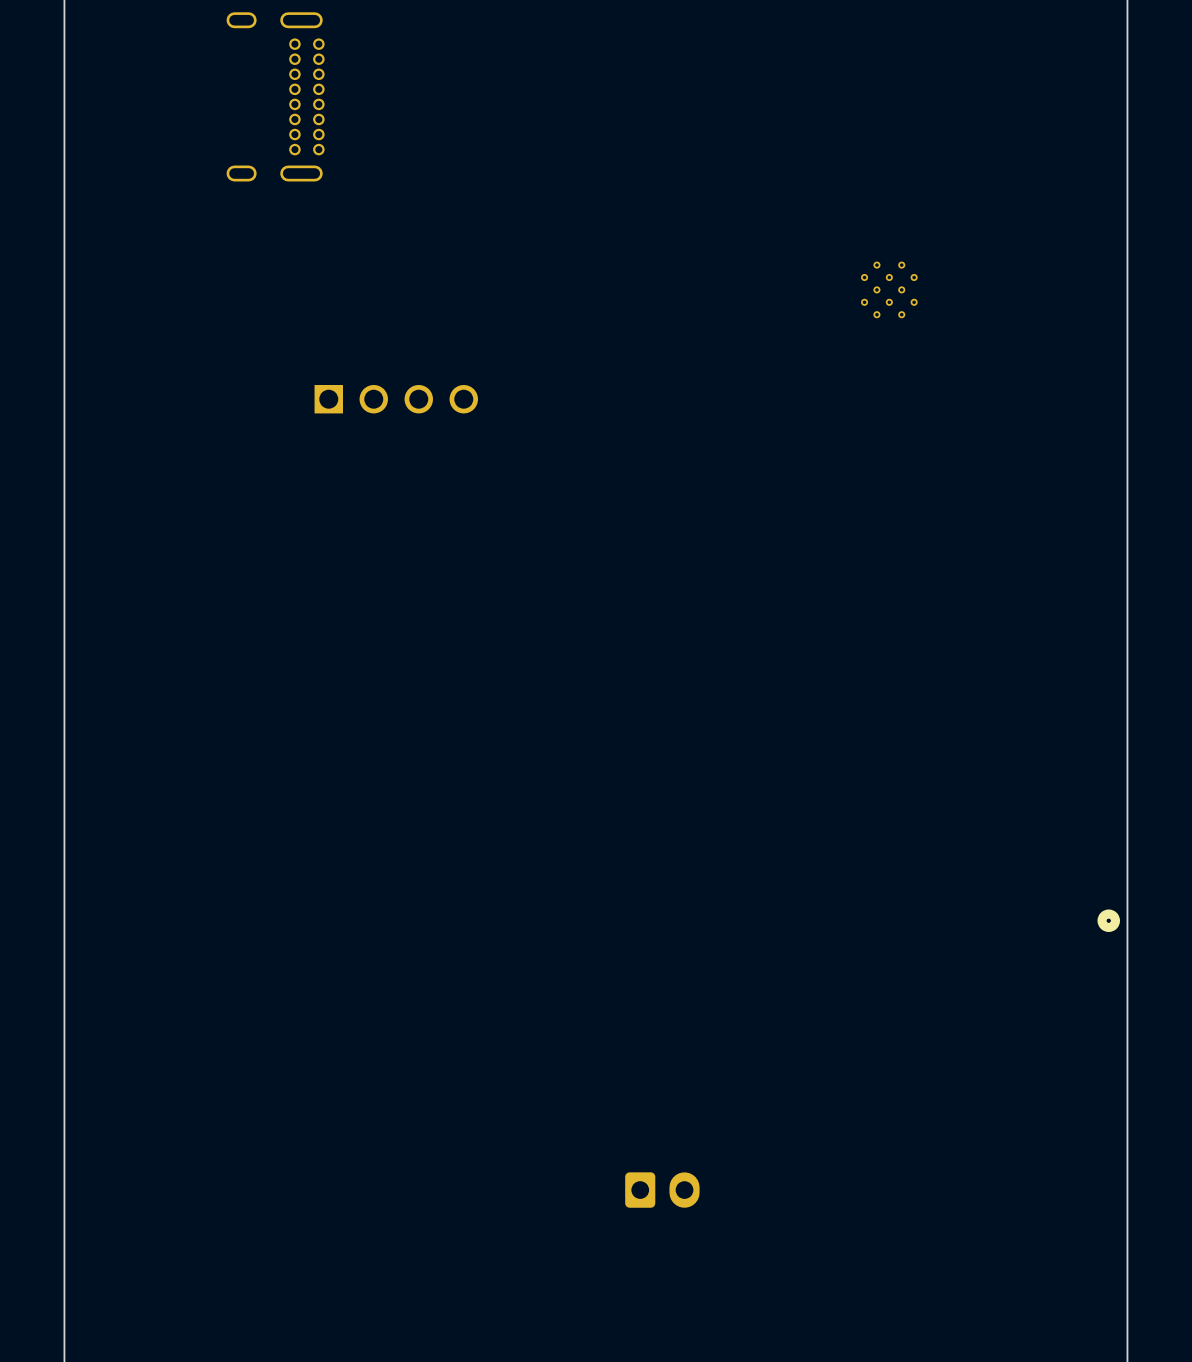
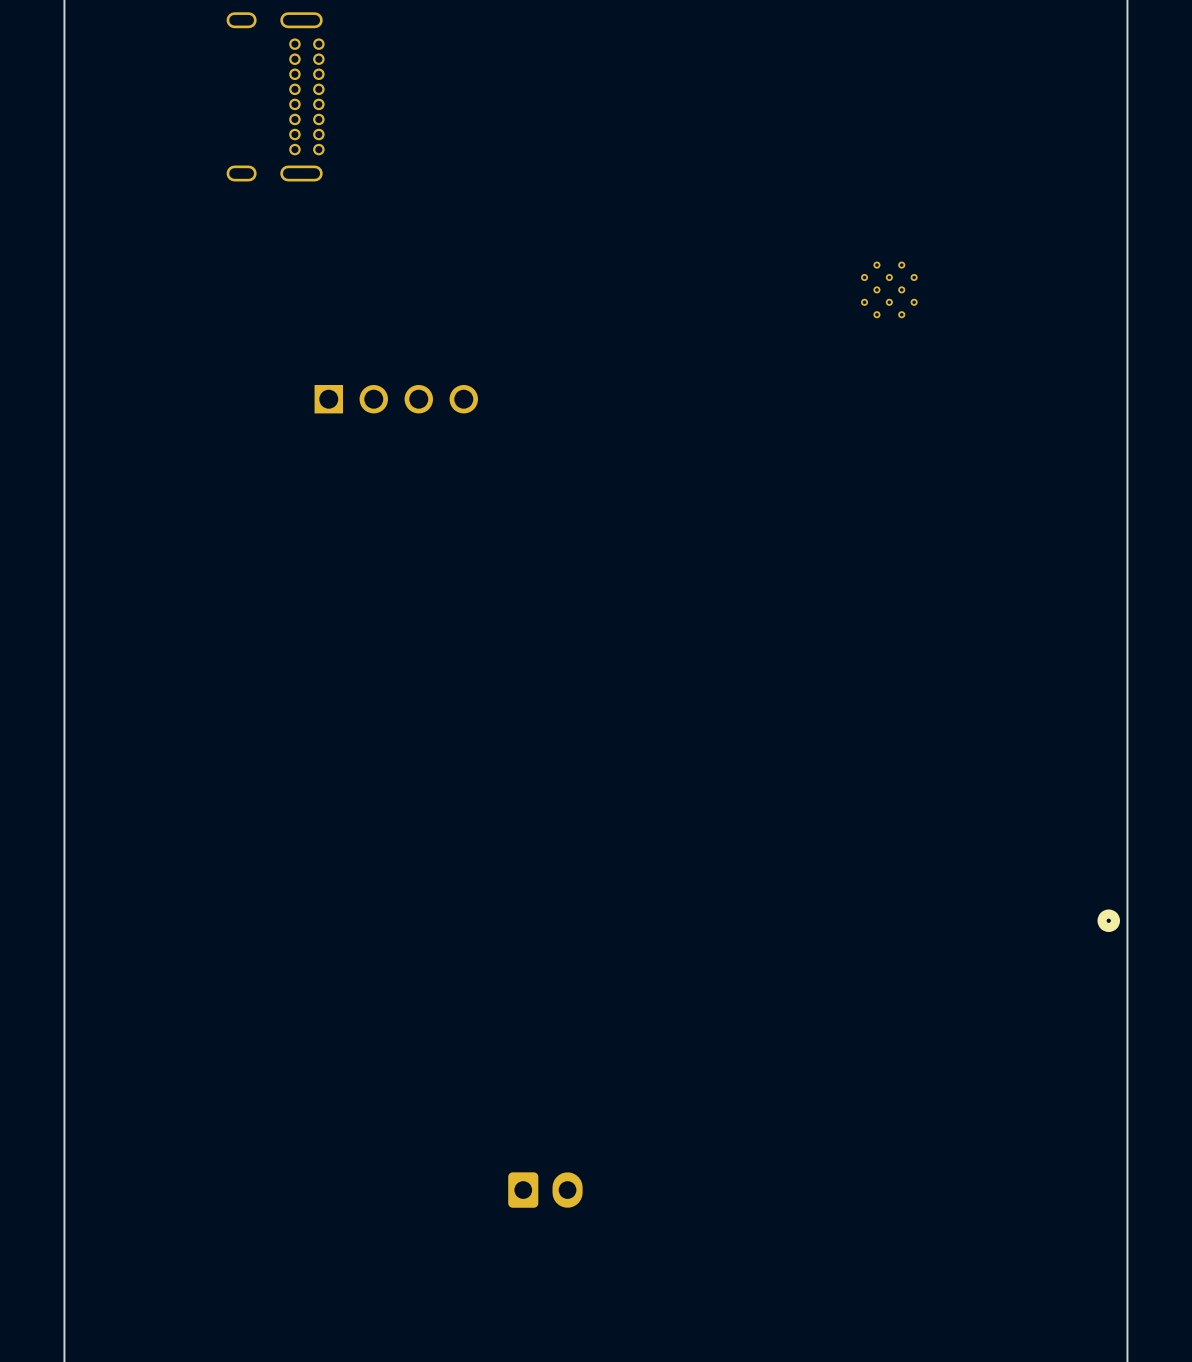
part position: (662, 1190) -> (545, 1190)

